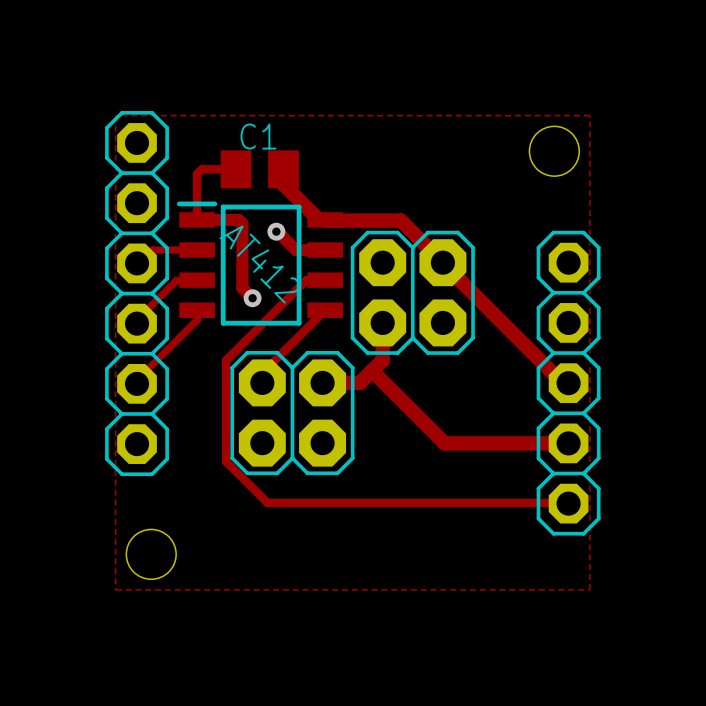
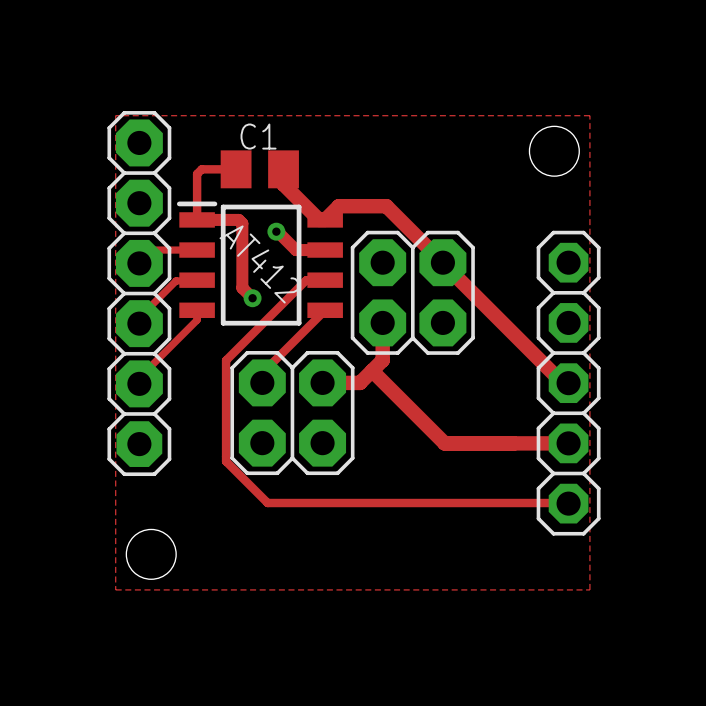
part footprint: [105, 111, 169, 477] -> [107, 111, 172, 477]
track: (325, 219) (400, 220) -> (325, 219) (338, 206) (386, 206) (400, 220)

